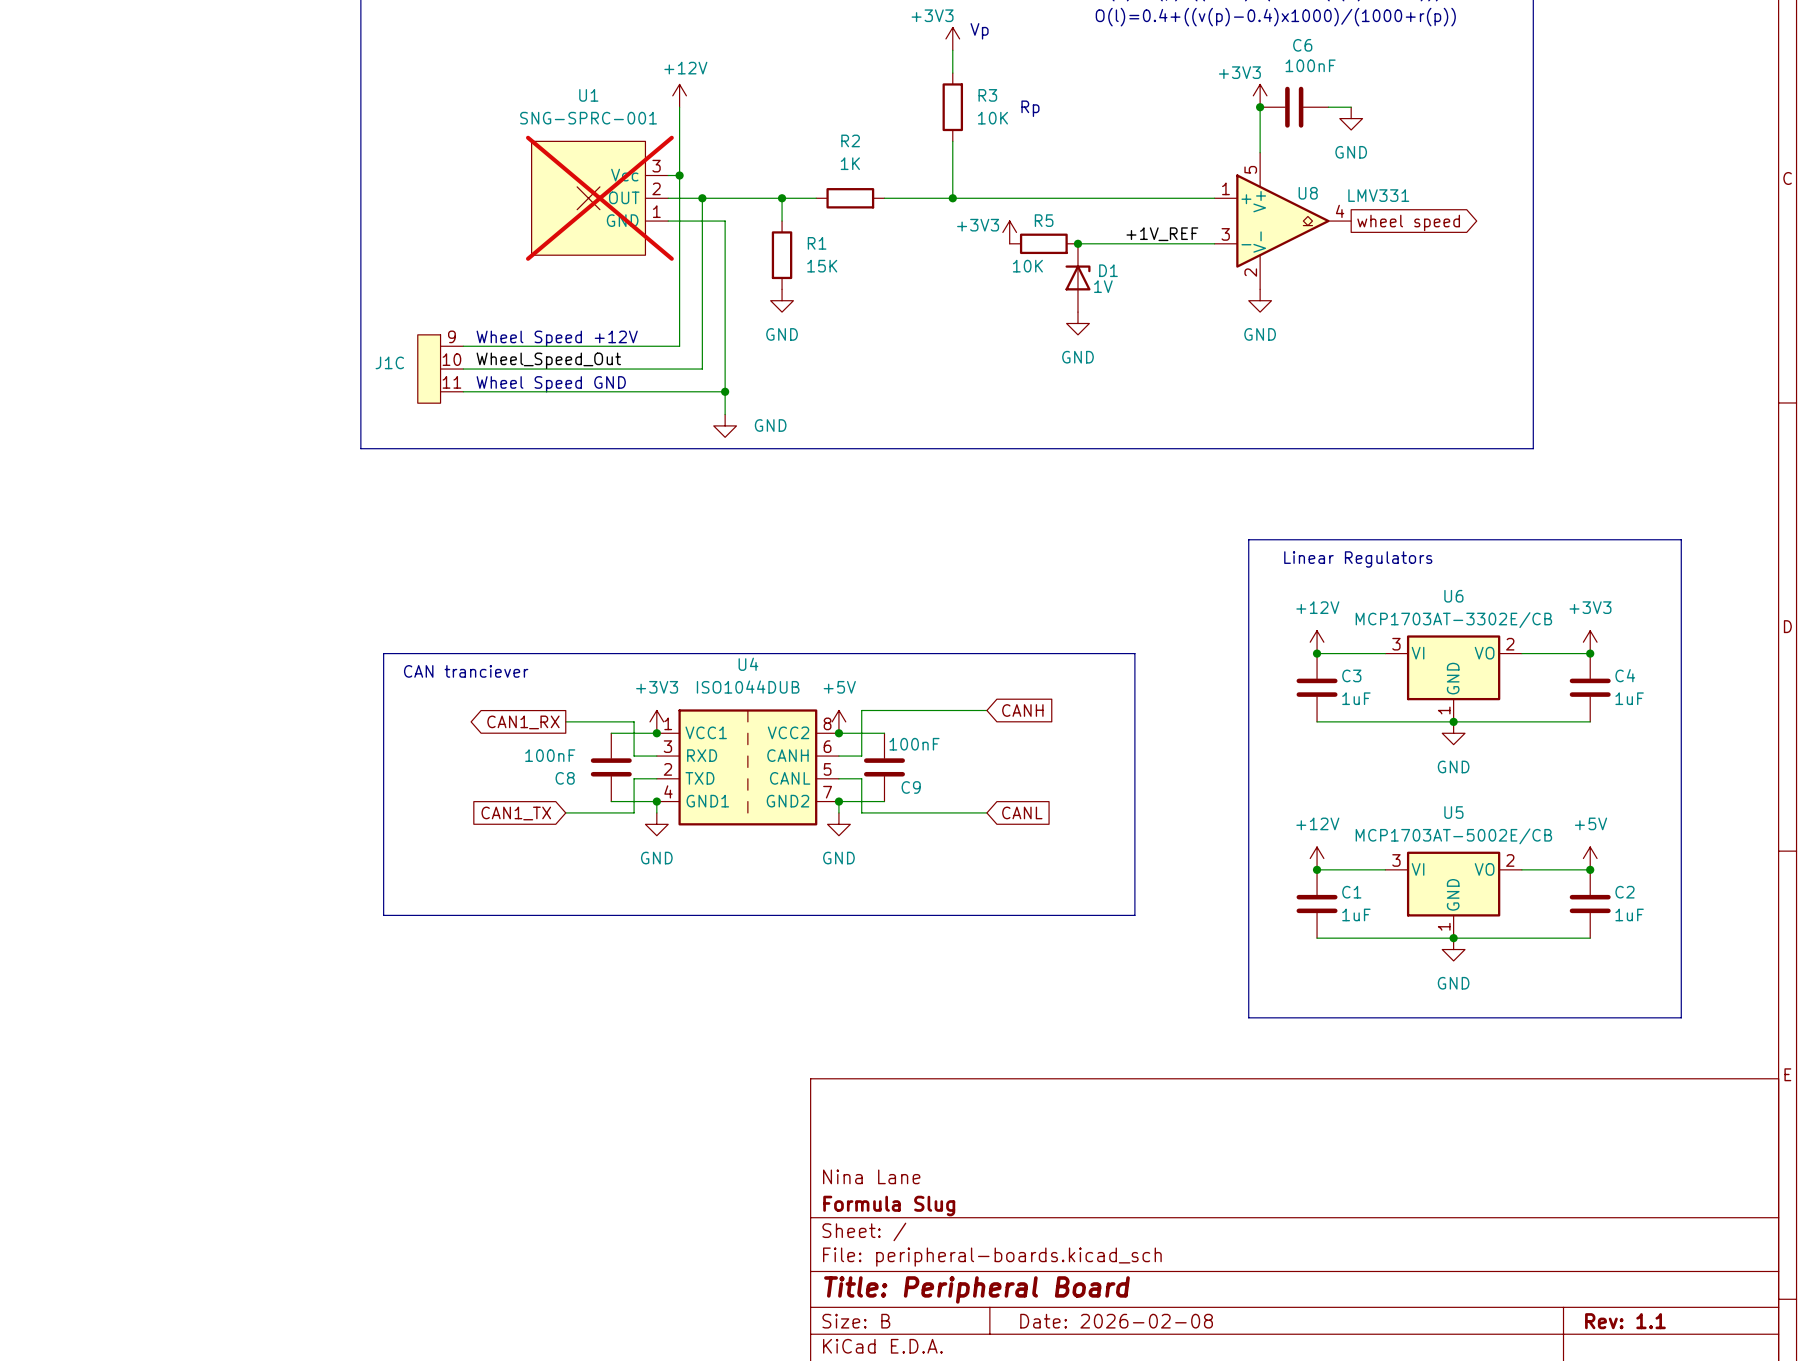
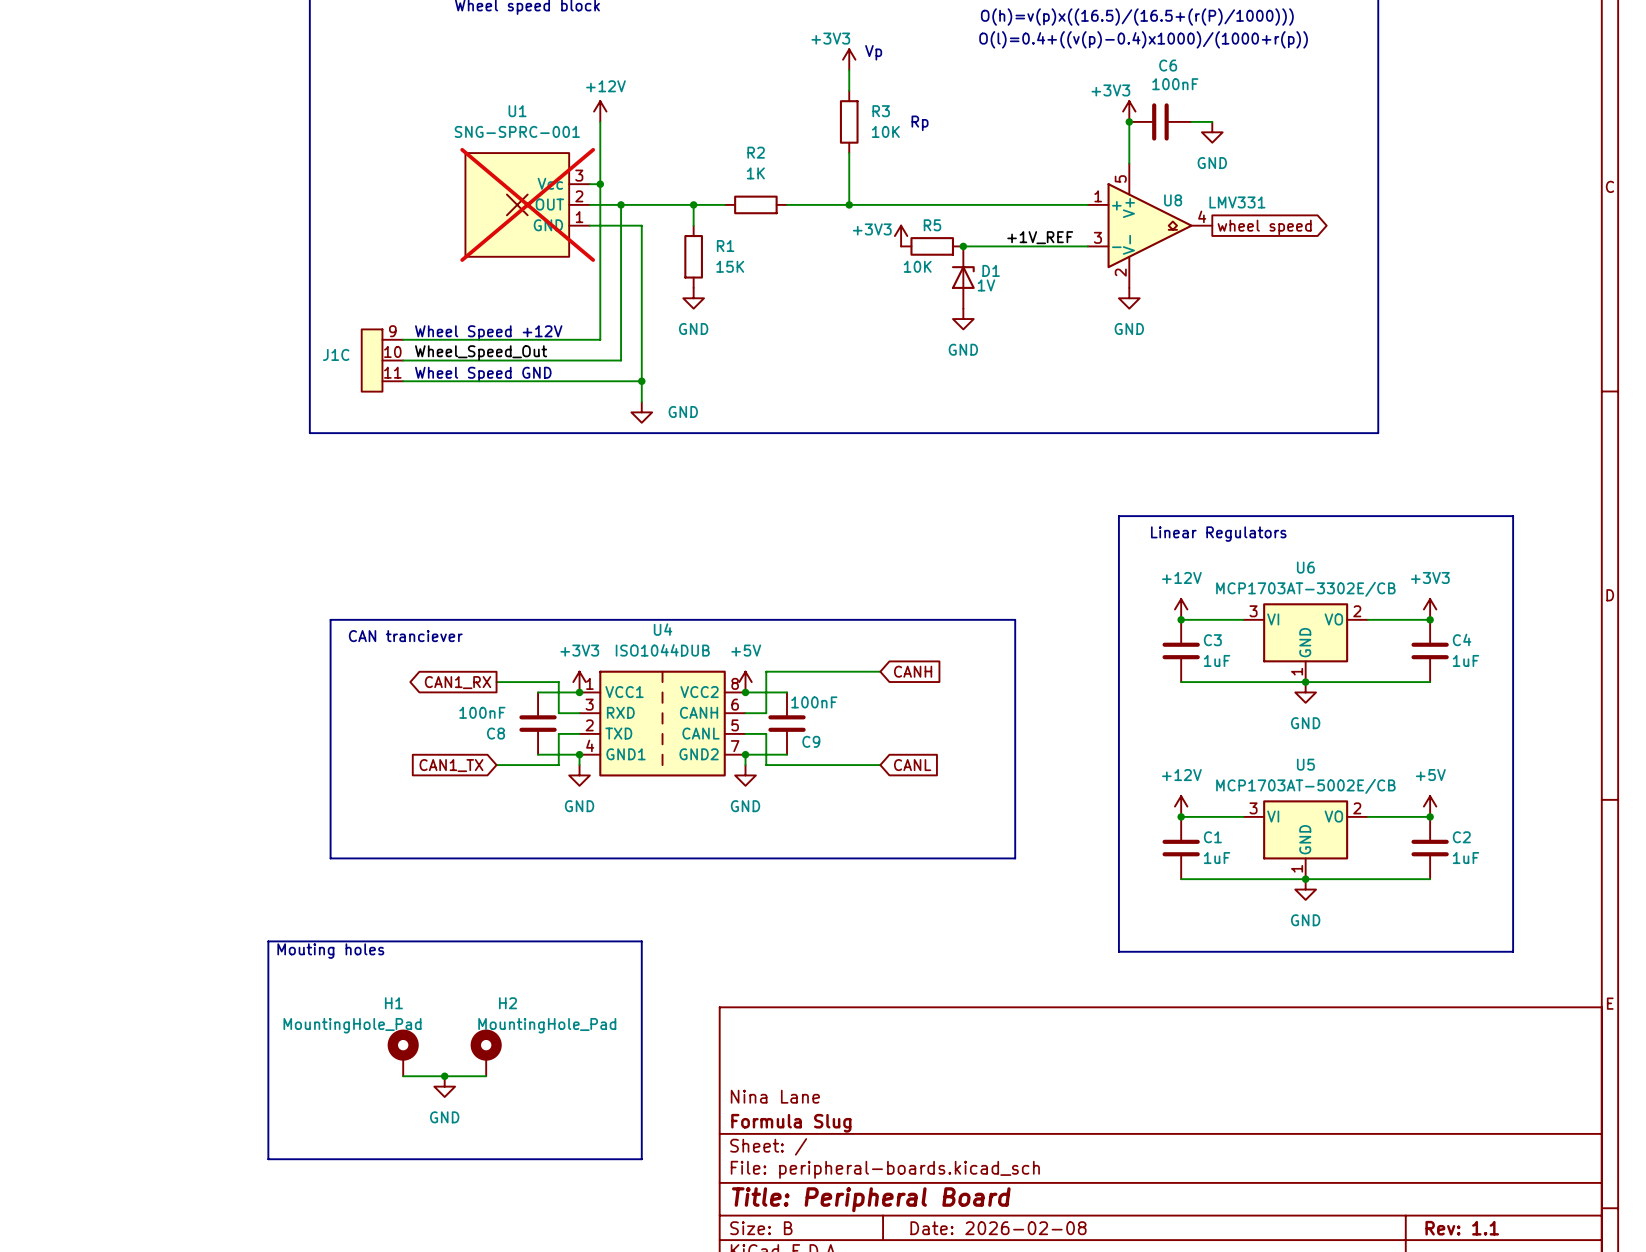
line: none -> (268, 941) (641, 941) (641, 1159) (268, 1159) (268, 941)
text: none -> Mouting holes (330, 951)
H1: none -> MountingHole_Pad (403, 1052)
H2: none -> MountingHole_Pad (486, 1052)
wire: none -> (403, 1076) (486, 1076)
junction: none -> (444, 1076)
power symbol: none -> GND (444, 1086)

